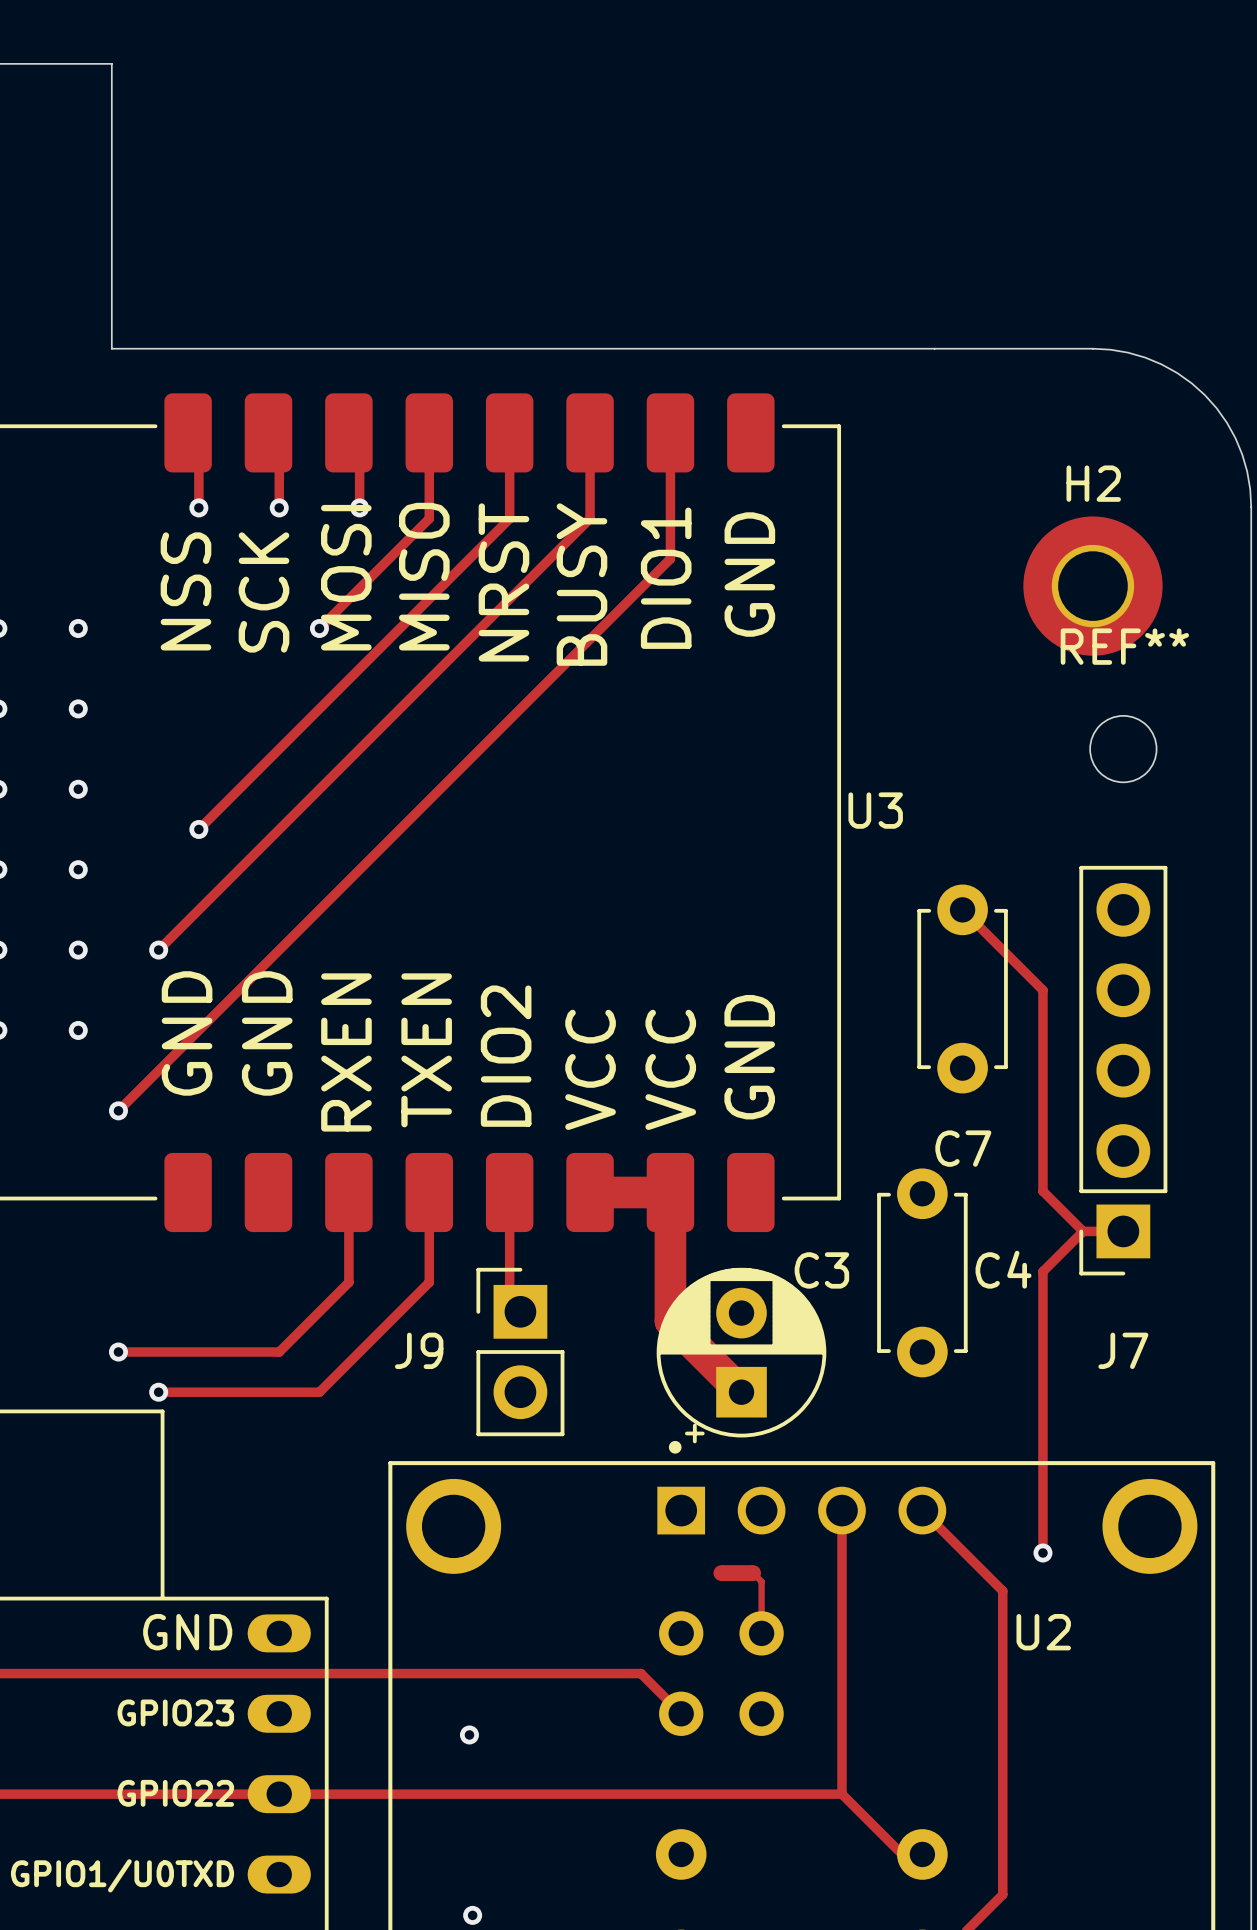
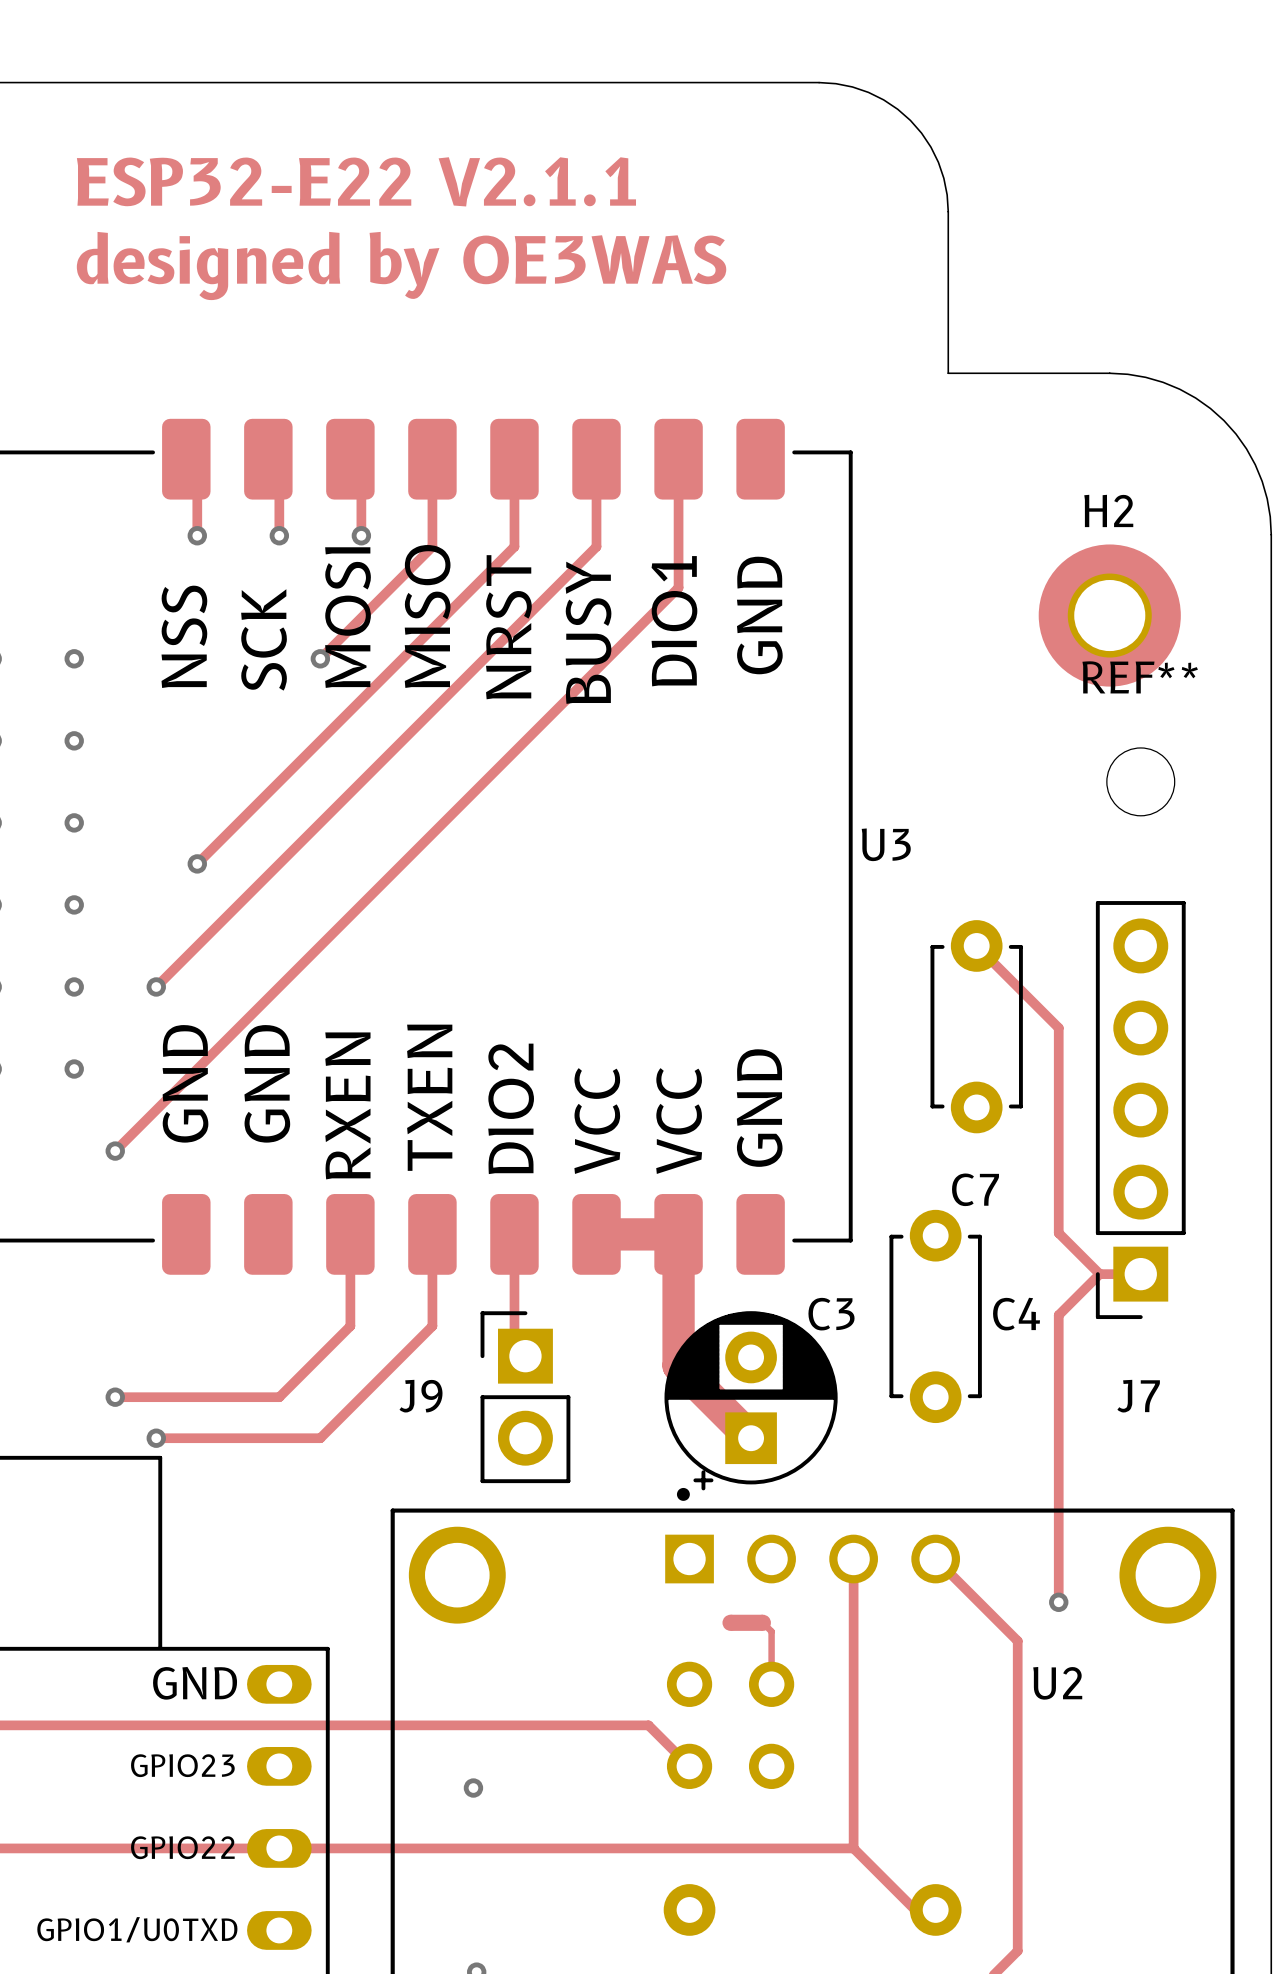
board edge: (111, 63) (111, 348) (934, 348) -> (108, 82) (819, 82) (852, 86) (868, 92) (897, 109) (921, 133) (938, 162) (943, 178) (948, 211) (948, 373)
text: none -> ESP32-E22 V2.1.1 (356, 181)
text: none -> designed by OE3WAS (401, 266)

